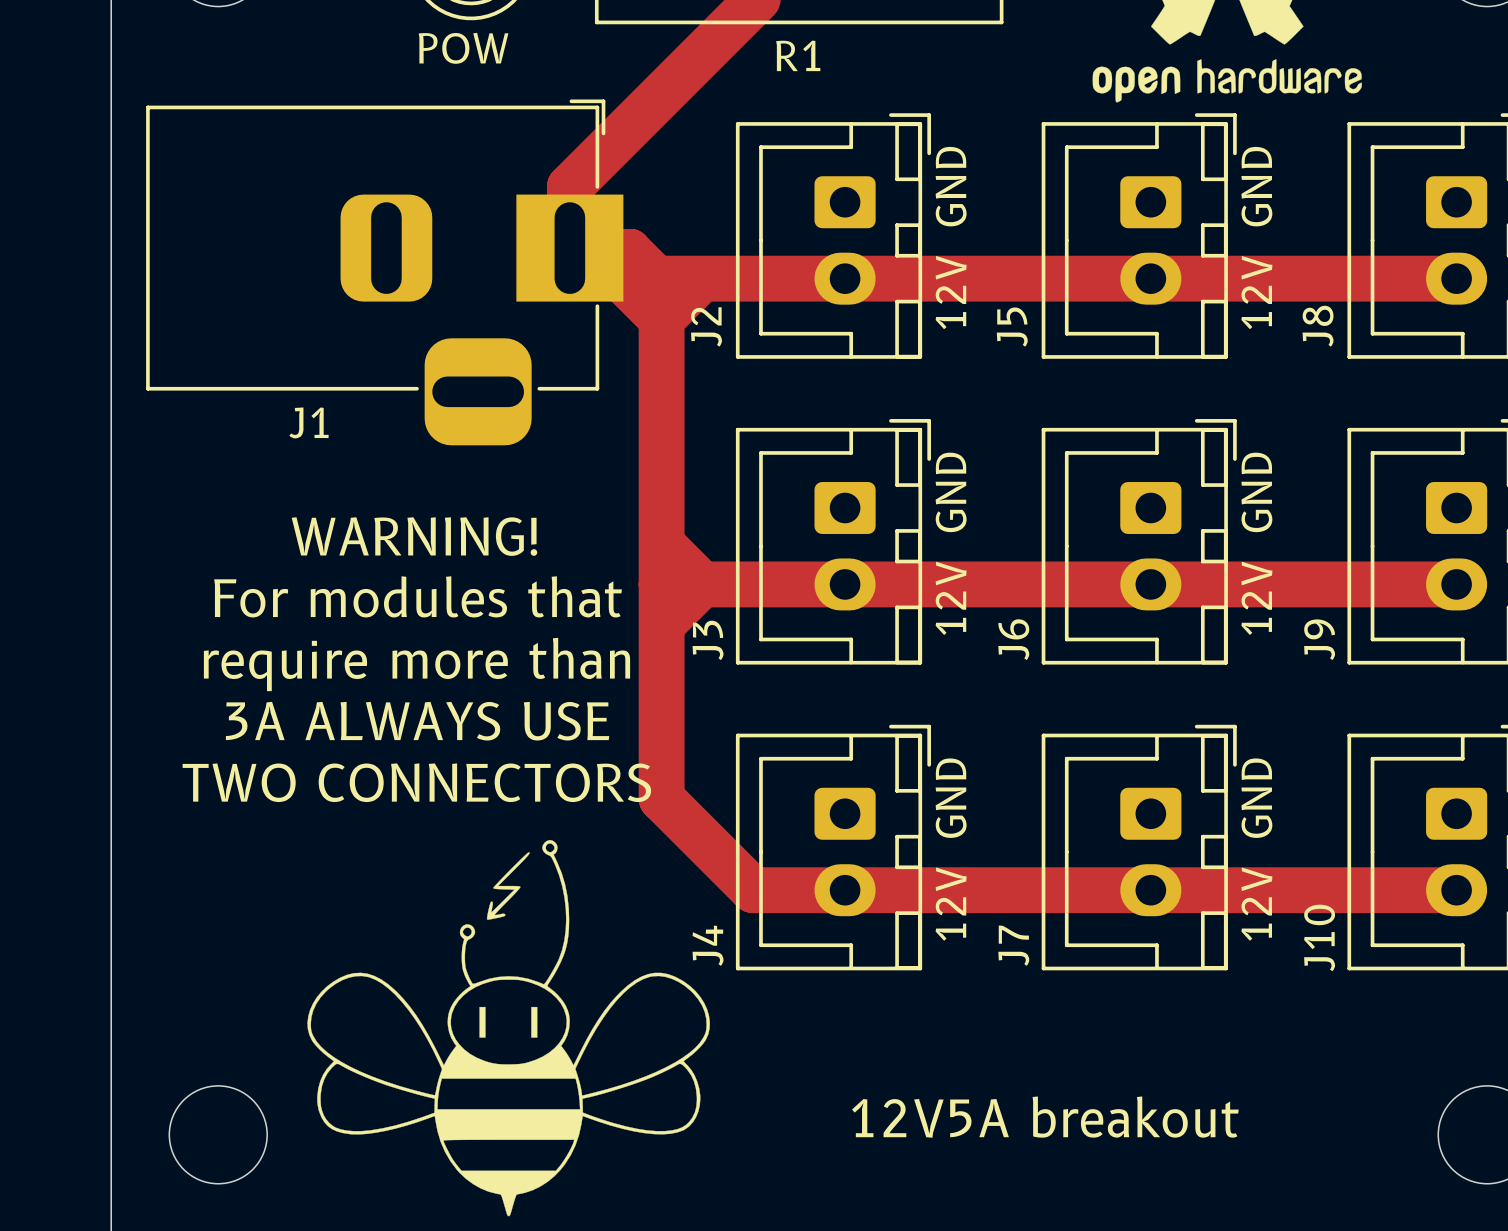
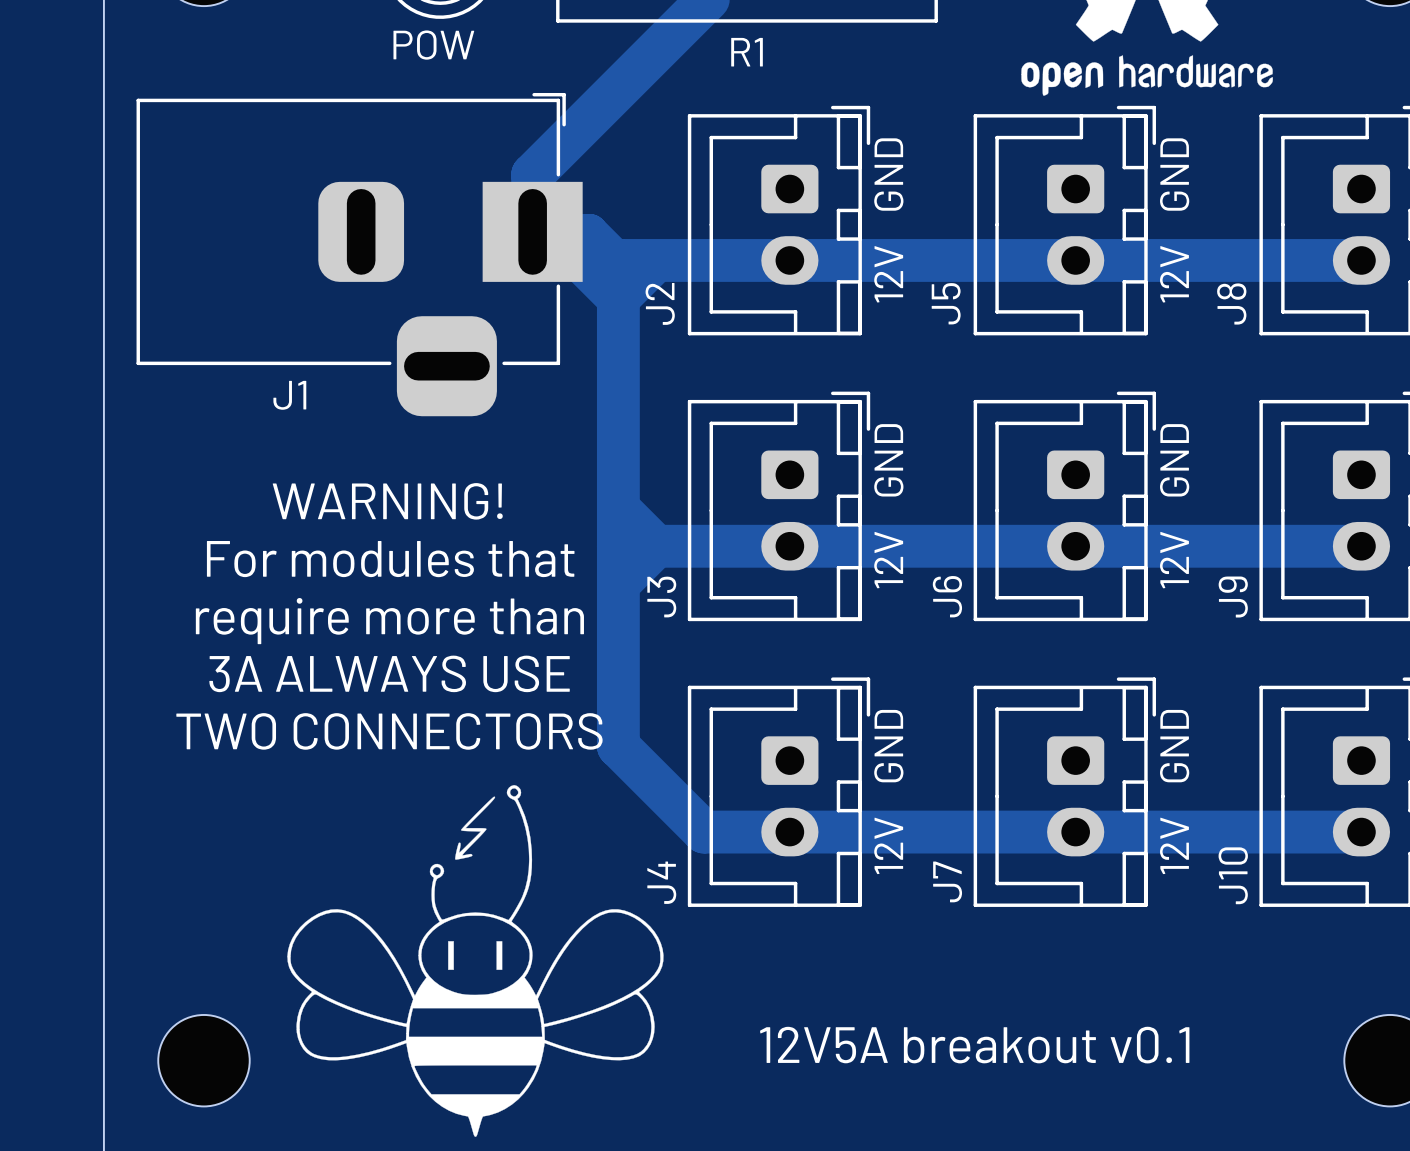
text: 12V5A breakout (1045, 1117) -> 12V5A breakout v0.1 (974, 1045)

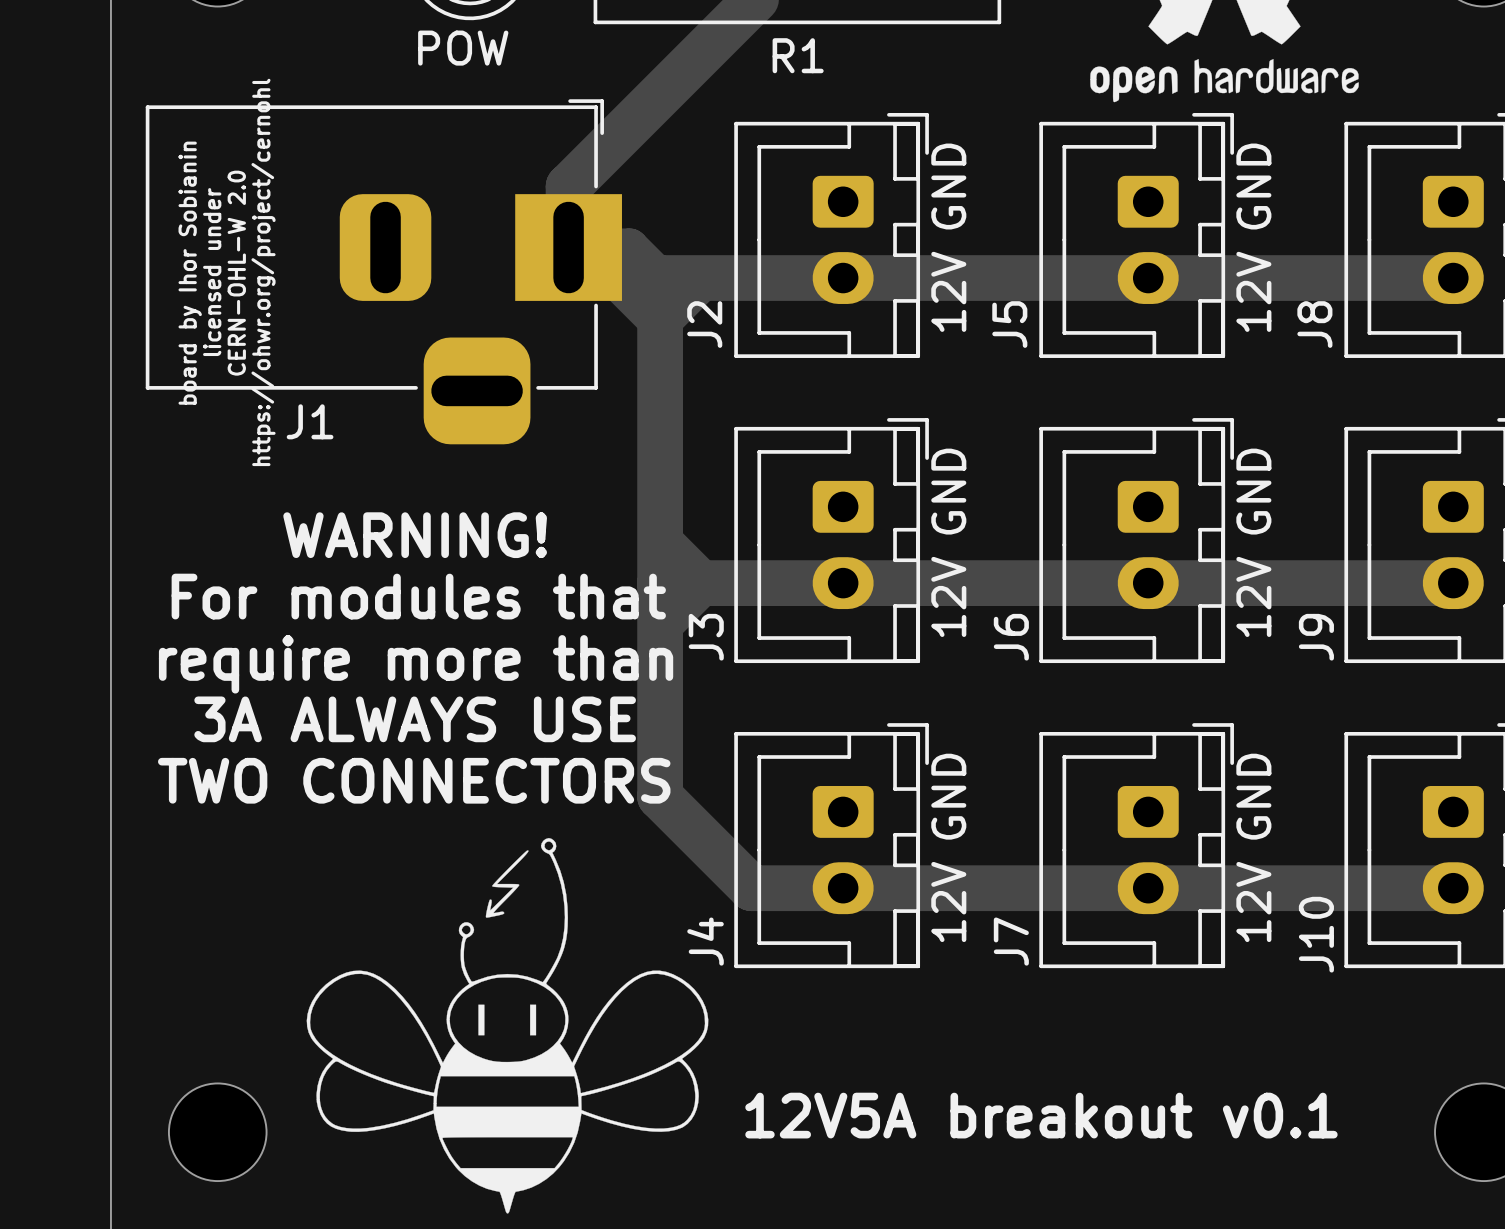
text: none -> board by Ihor Sobianin (190, 273)
text: none -> licensed under (212, 272)
text: none -> CERN-OHL-W 2.0 (236, 273)
text: none -> https://ohwr.org/project/cernohl (263, 272)

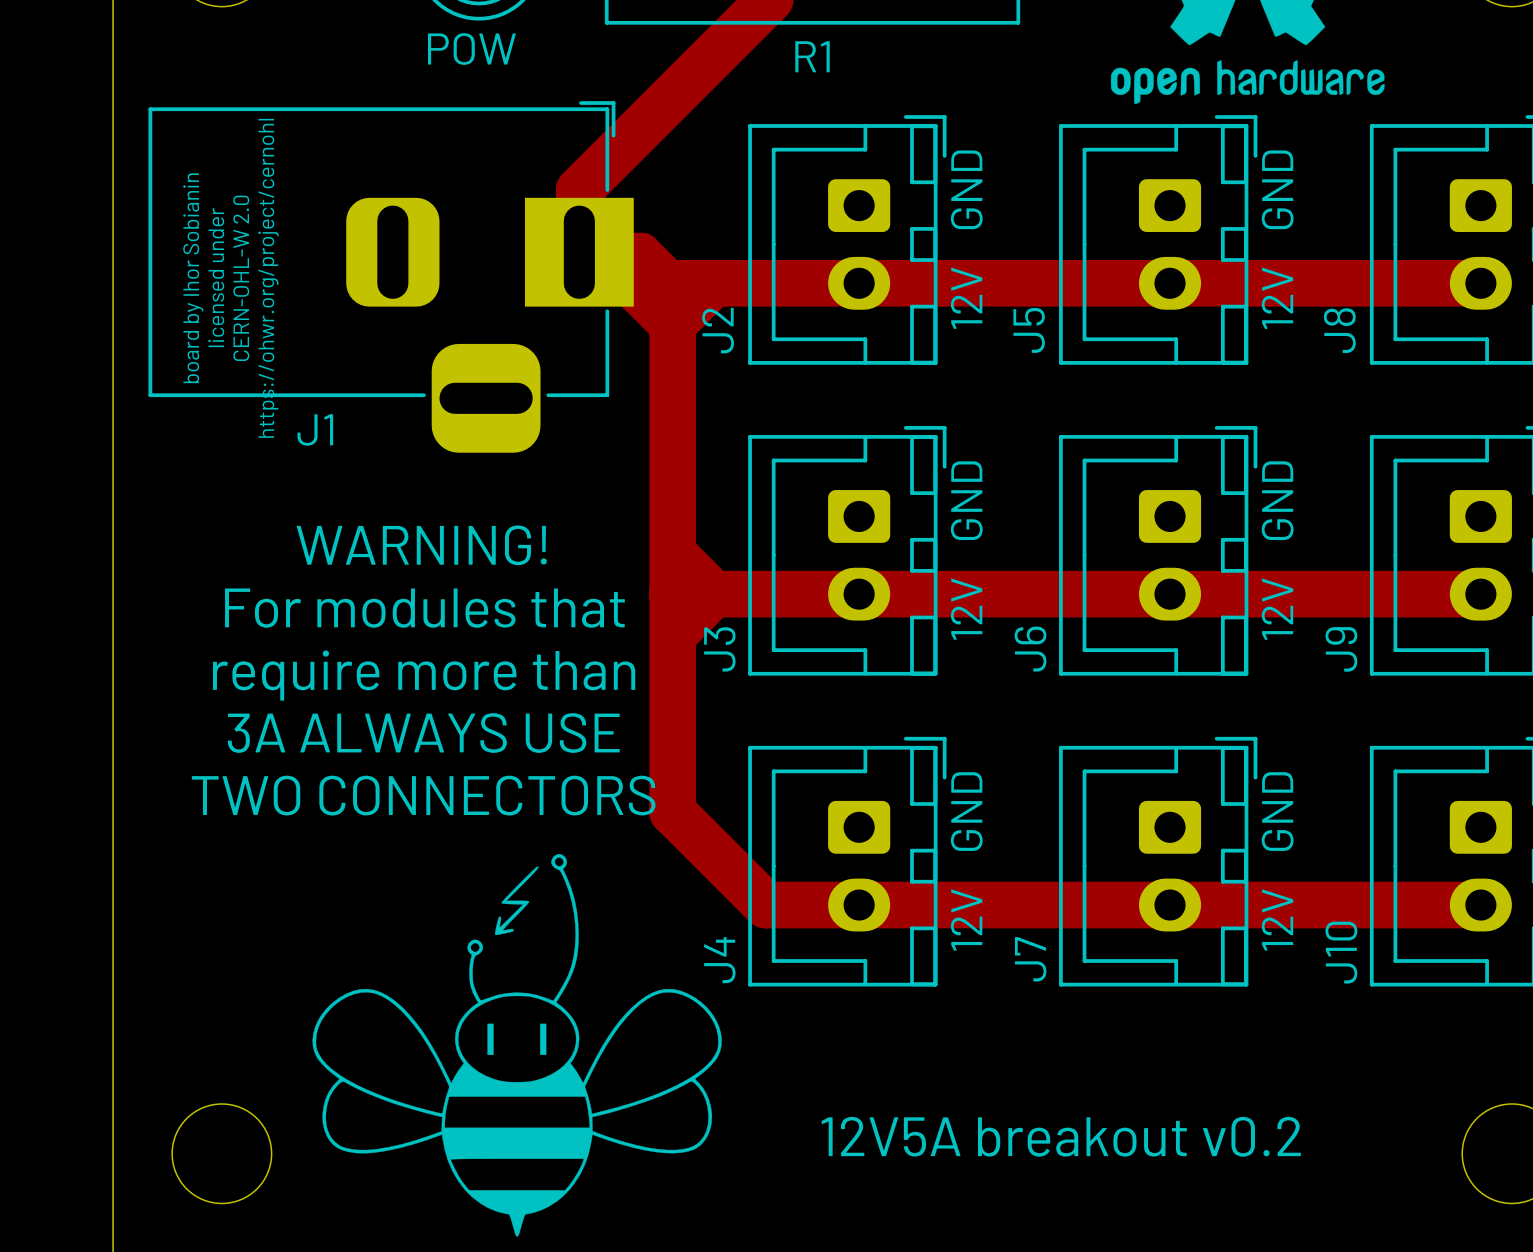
text: 12V5A breakout v0.1 (1041, 1115) -> 12V5A breakout v0.2 (1061, 1136)

